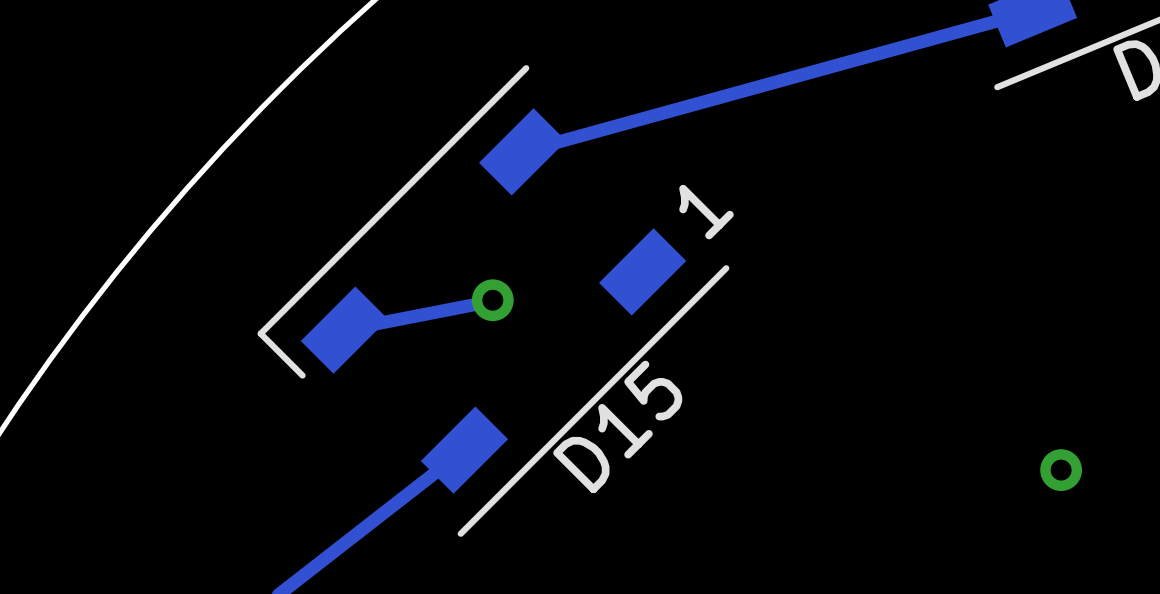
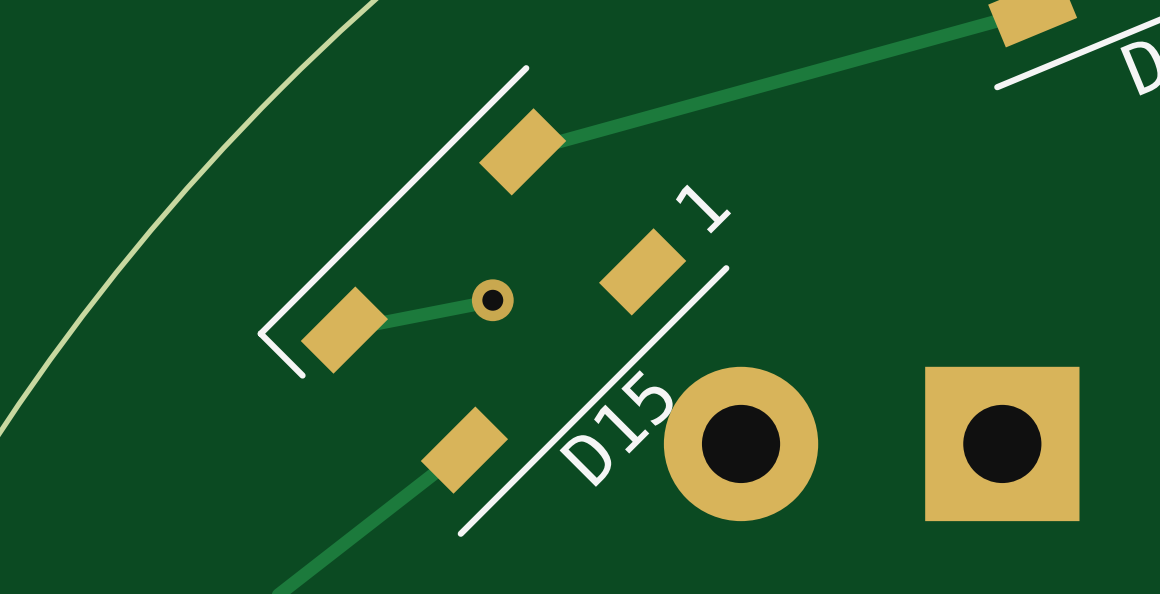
part: none -> (871, 443)
via: (1061, 470) -> none

